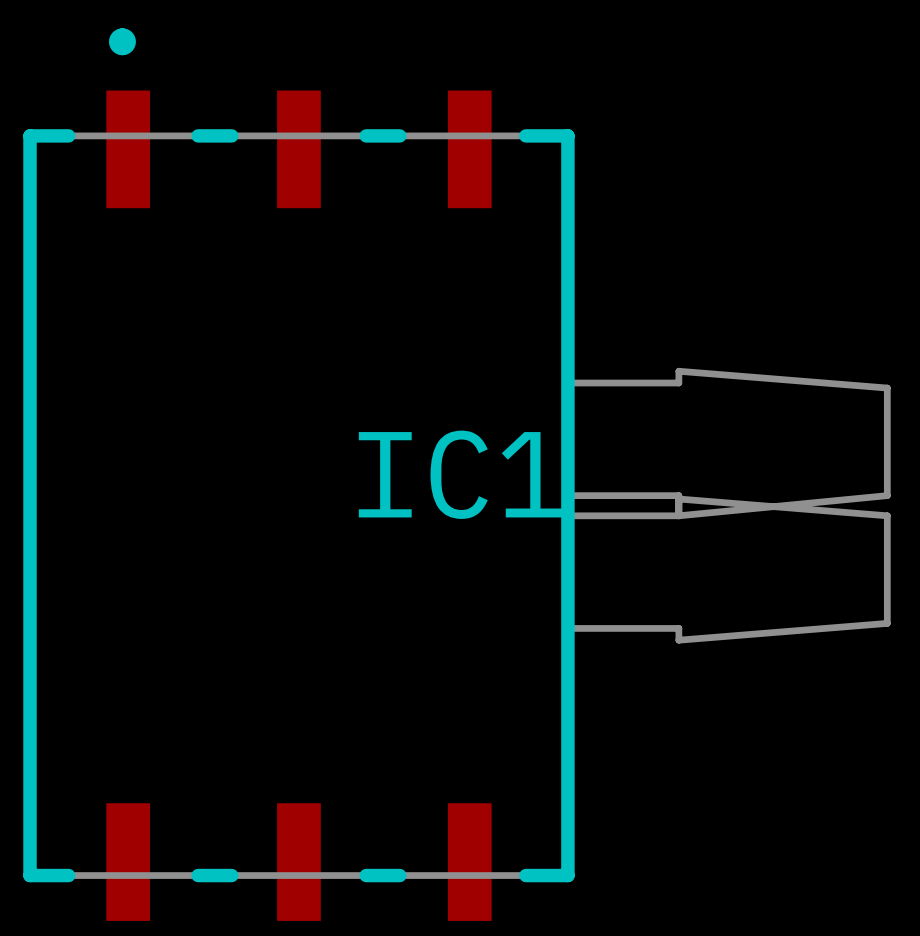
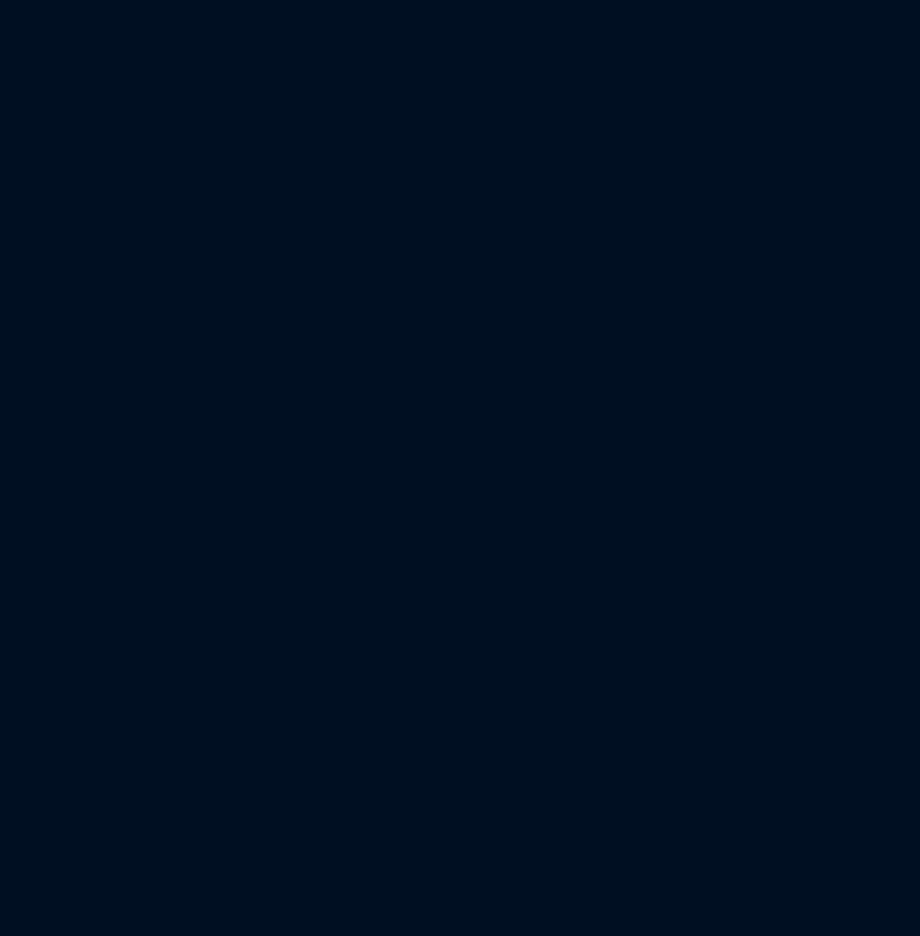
IC1: (456, 474) -> none

